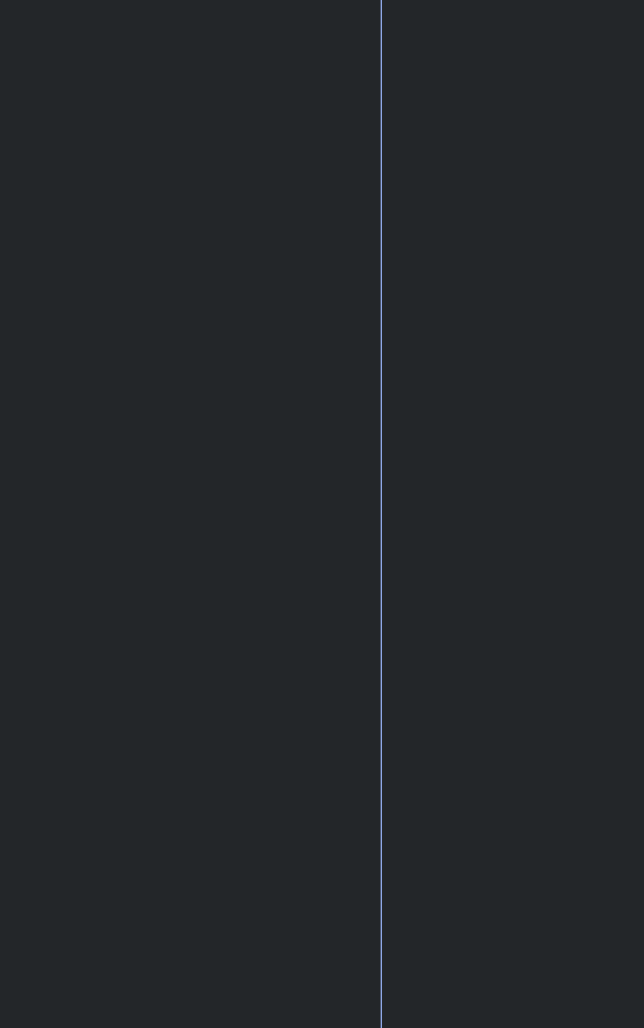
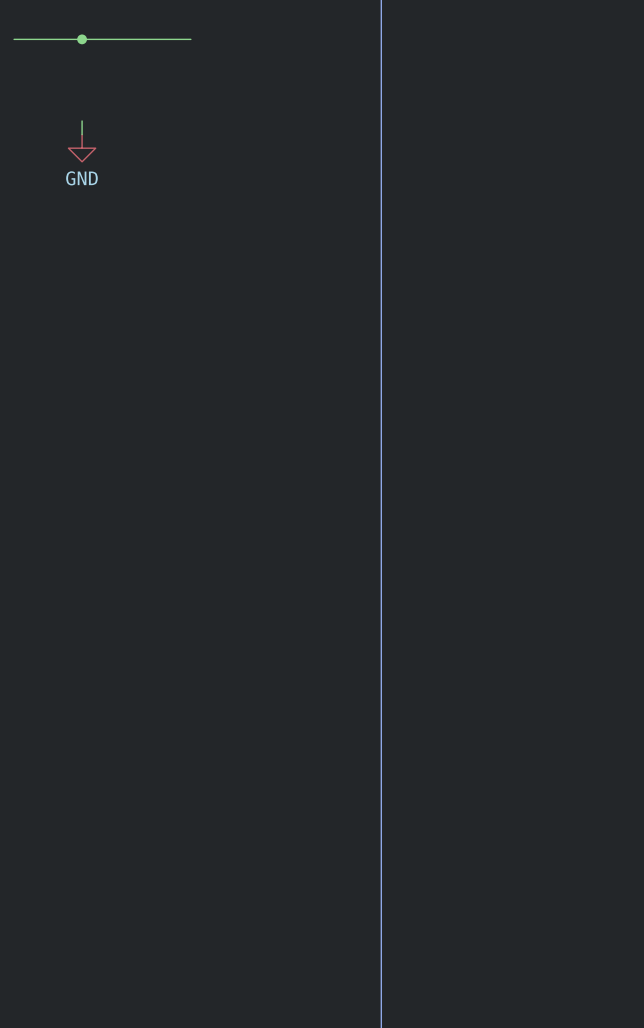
wire: none -> (14, 39) (190, 39)
junction: none -> (82, 39)
wire: none -> (82, 120) (82, 134)
power symbol: none -> GND (82, 148)

